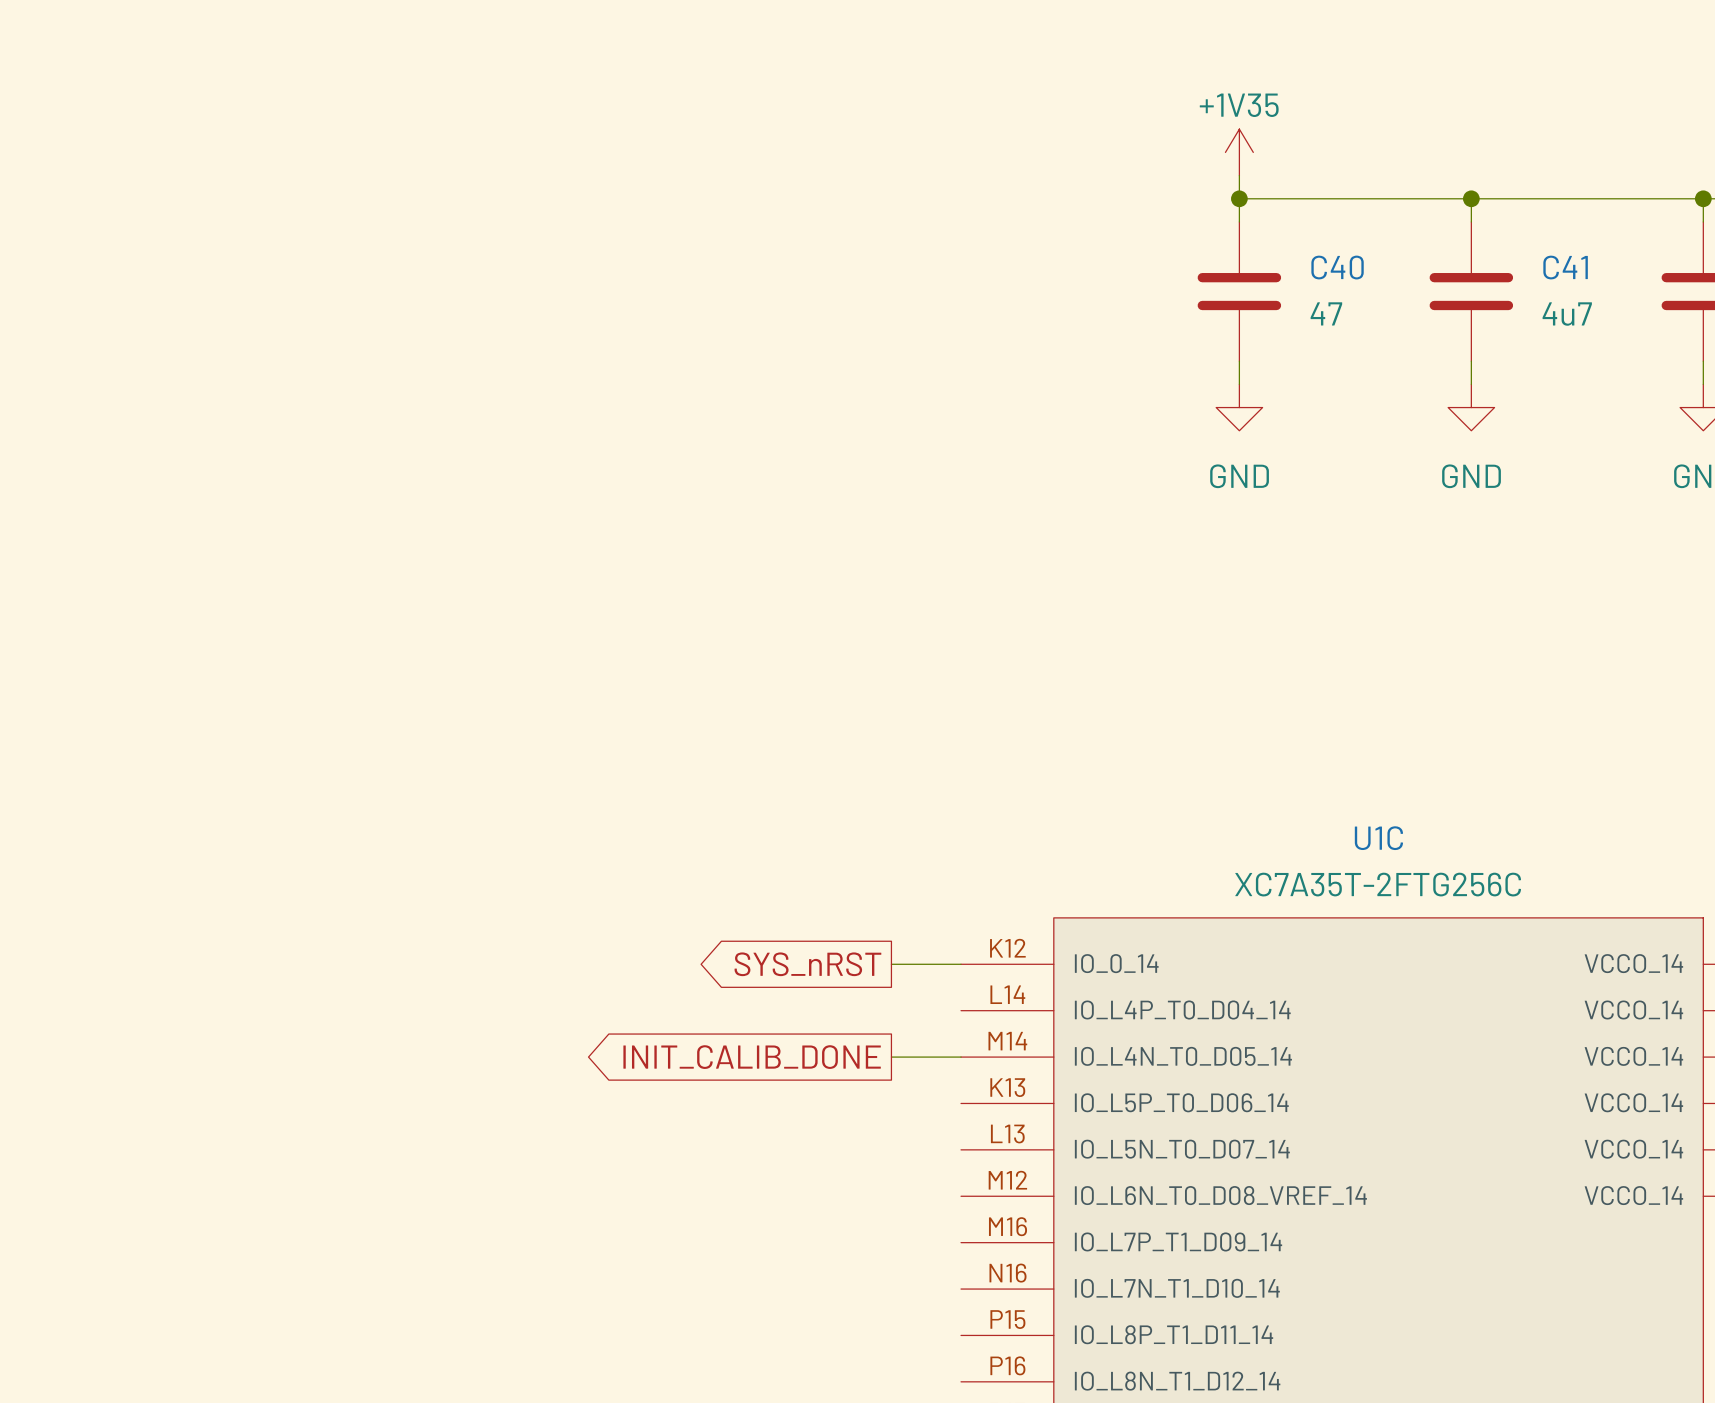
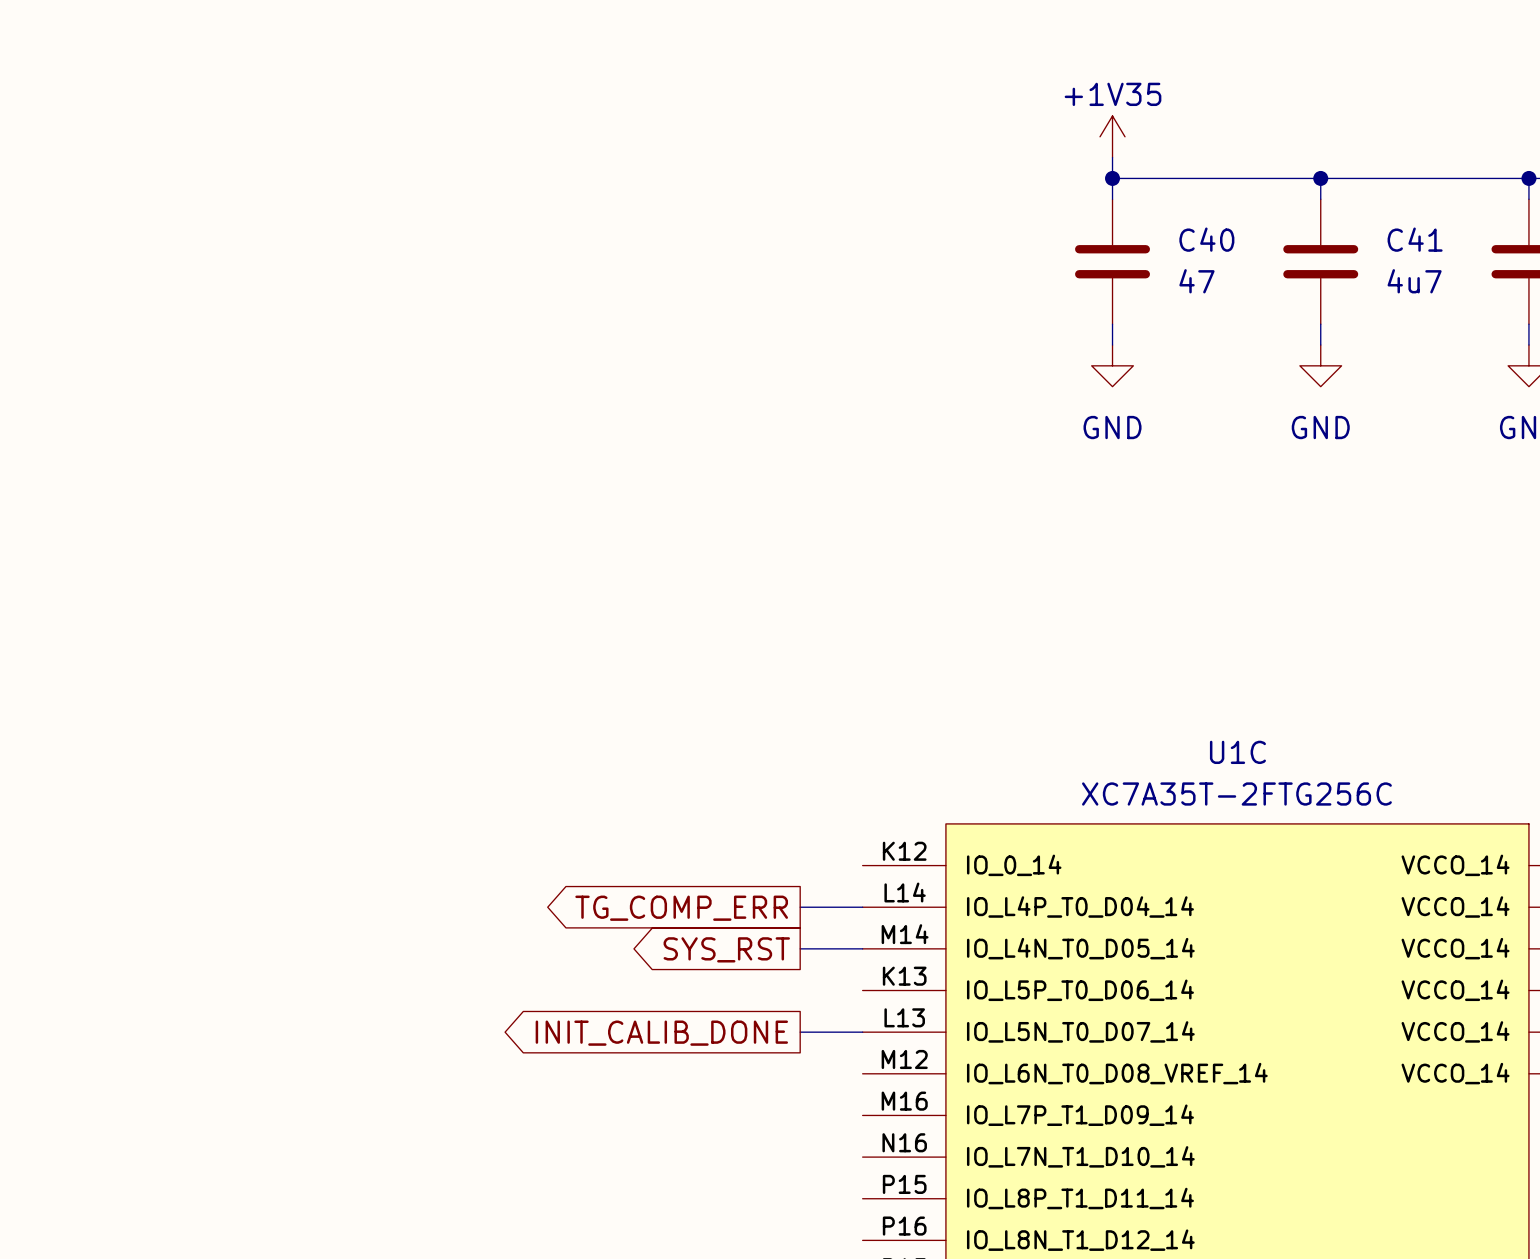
global label: SYS_nRST (807, 964) -> none
wire: (891, 964) (961, 964) -> (800, 907) (862, 907)
global label: none -> TG_COMP_ERR (681, 908)
global label: INIT_CALIB_DONE (752, 1057) -> SYS_RST (726, 949)
global label: none -> INIT_CALIB_DONE (661, 1033)
wire: none -> (800, 1032) (862, 1032)

